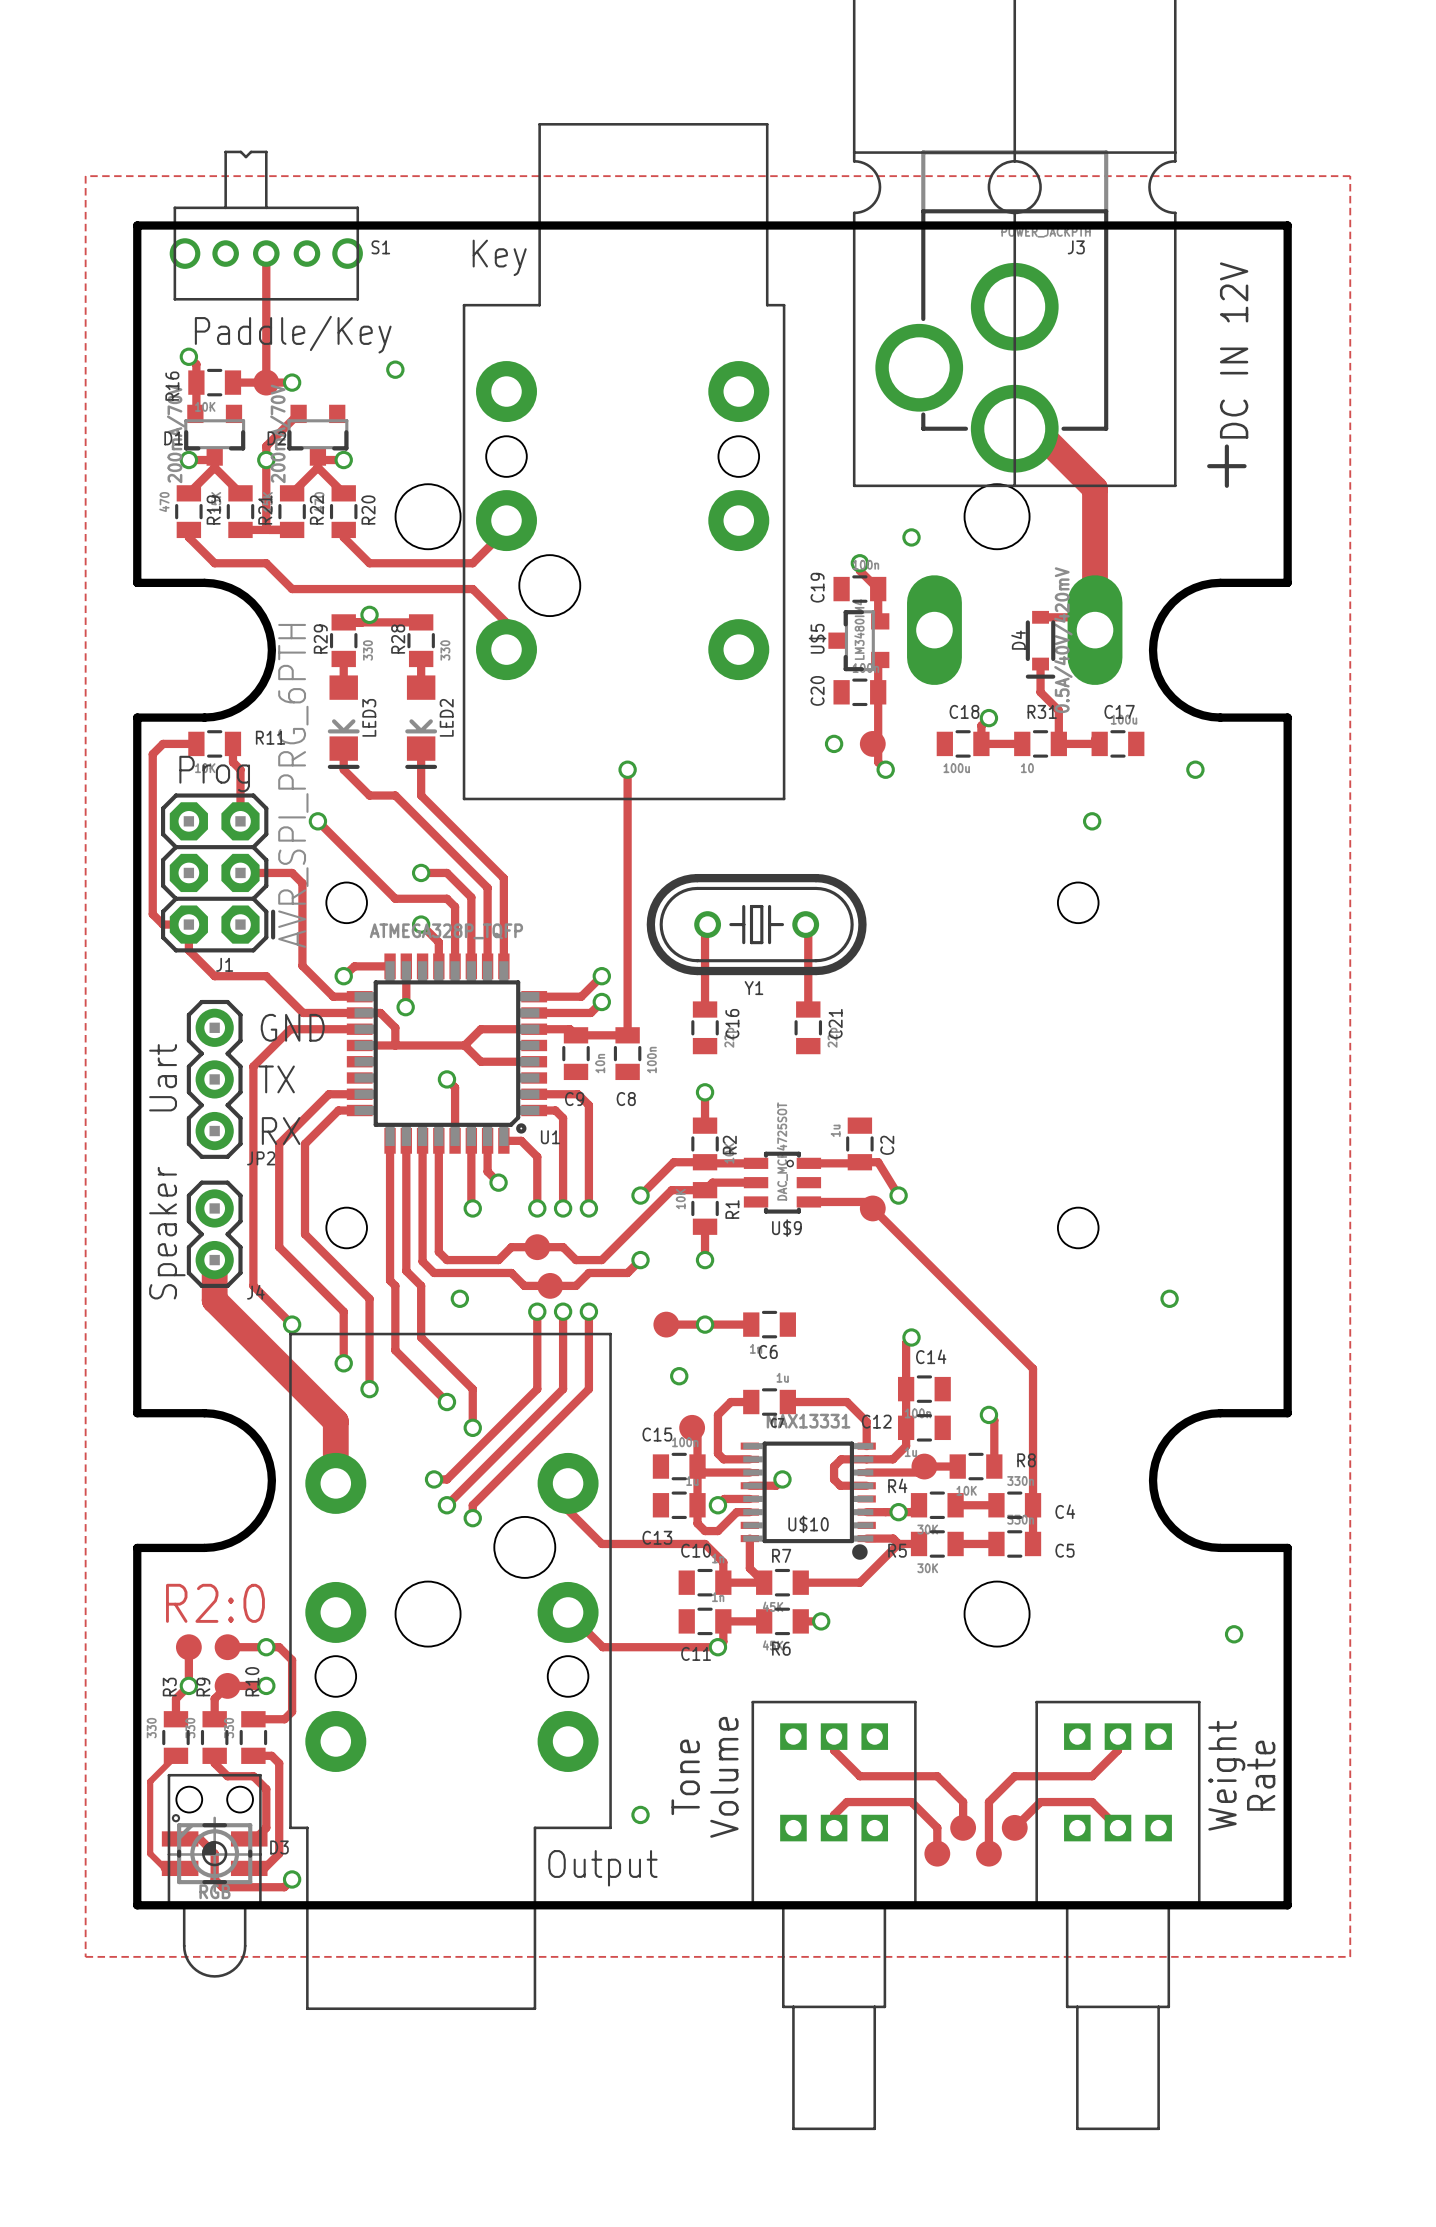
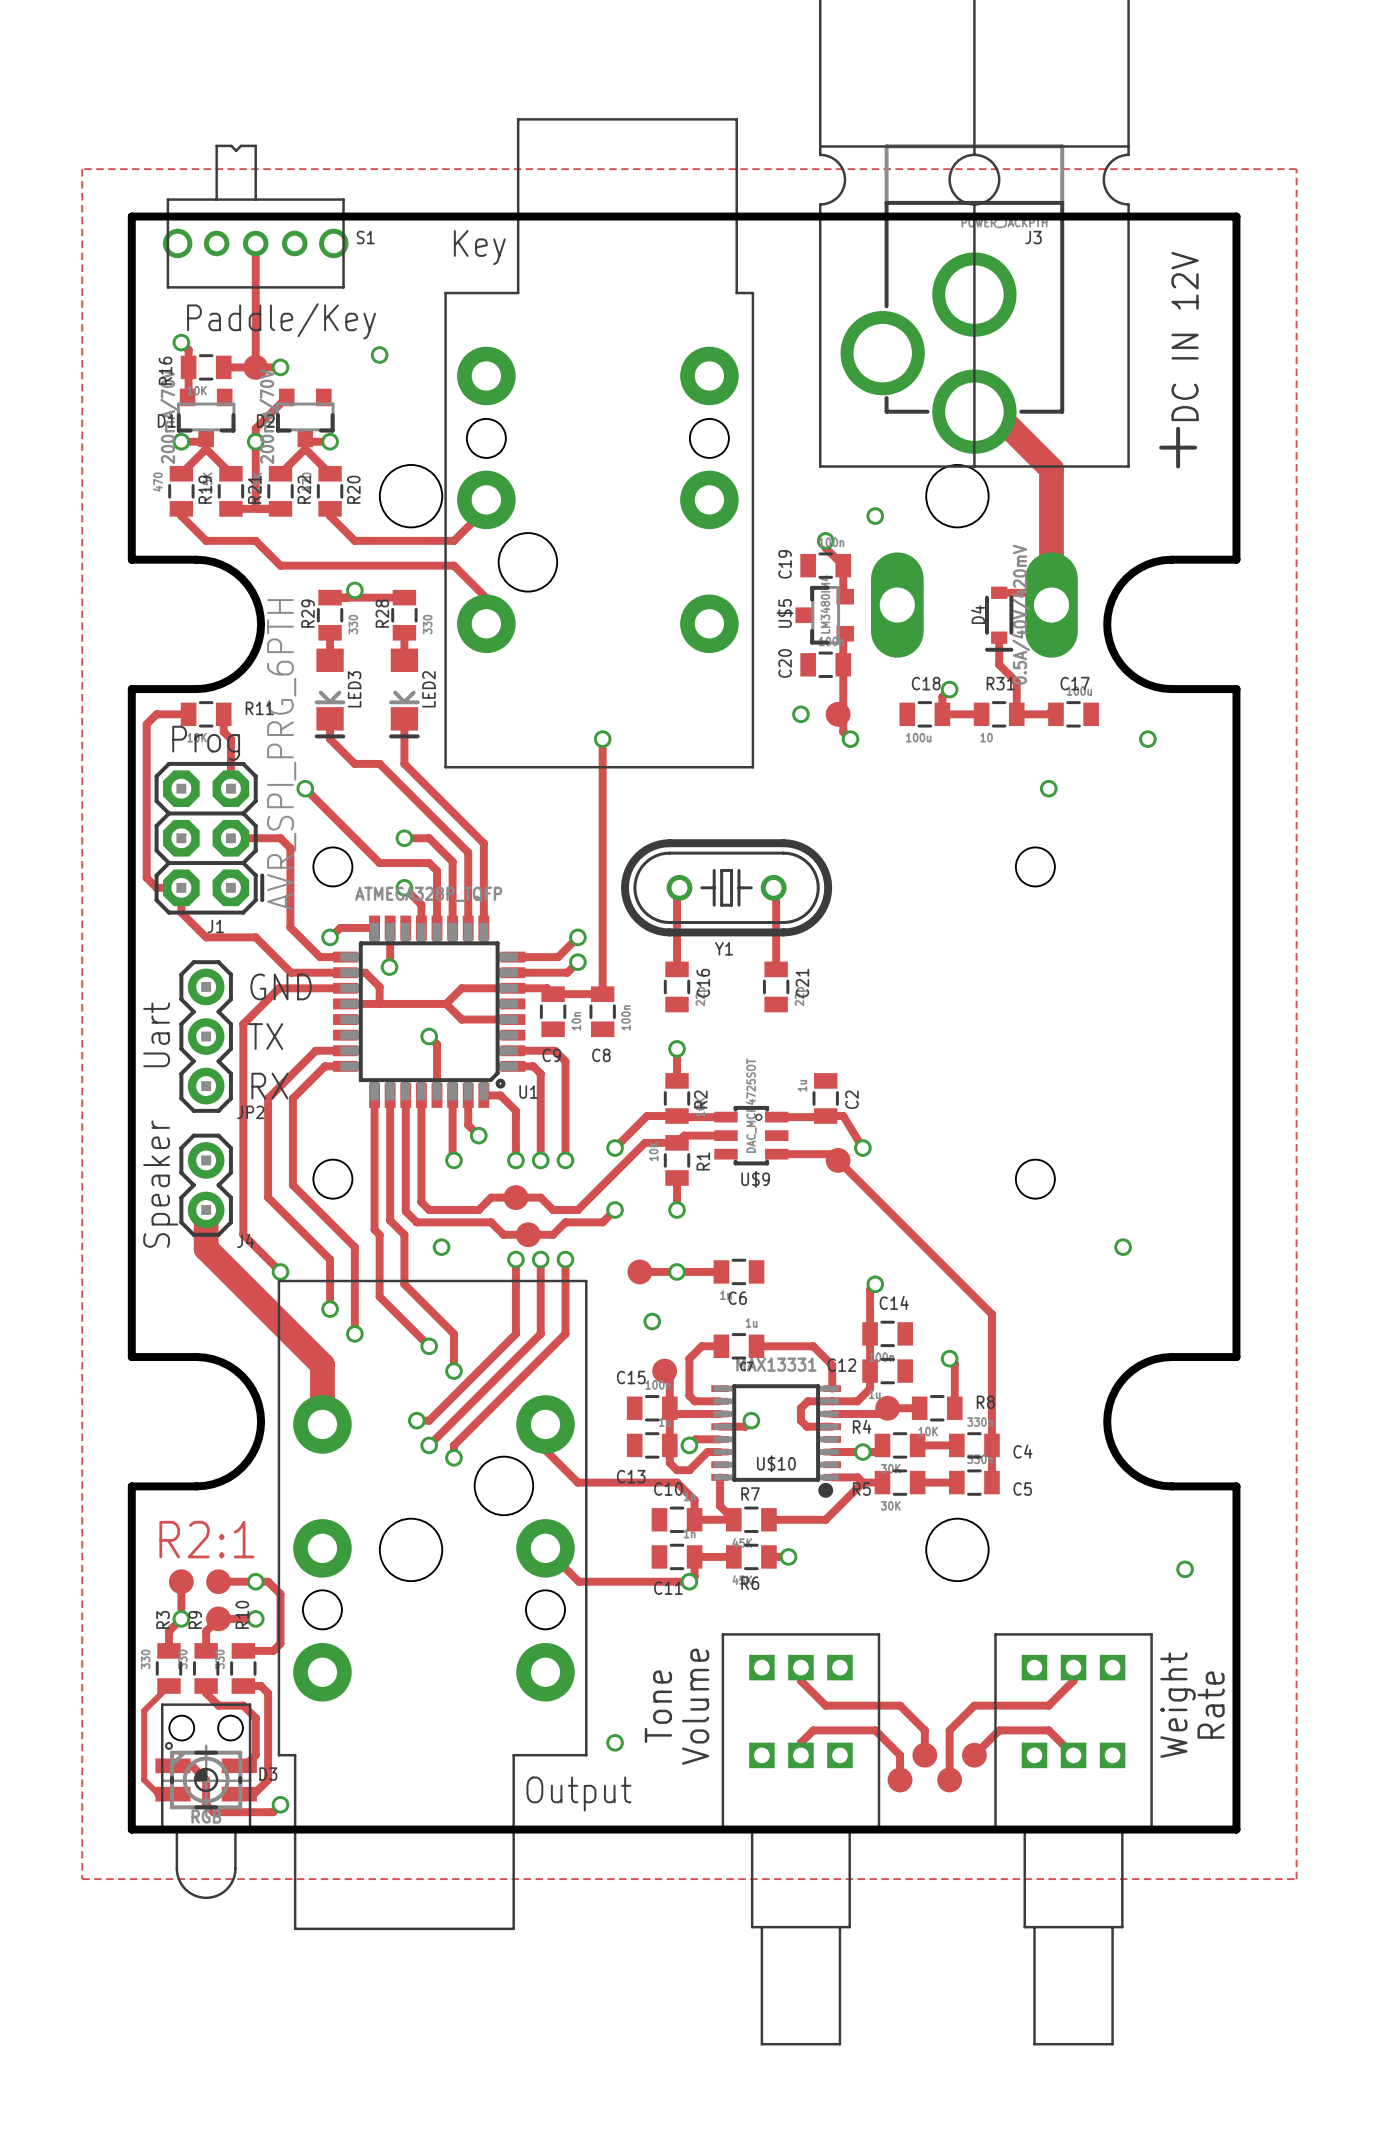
text: R2:0 (215, 1603) -> R2:1 (206, 1539)

